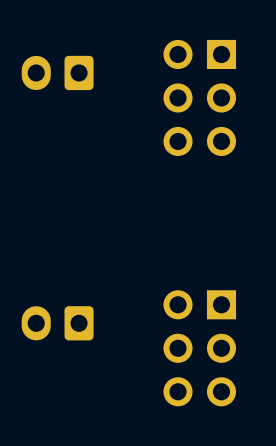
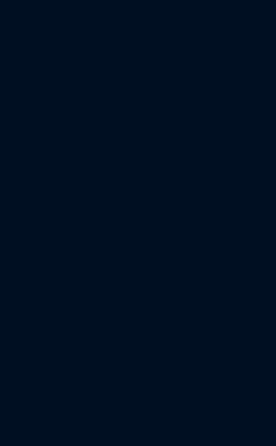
part: (57, 72) -> none
part: (199, 97) -> none
part: (57, 323) -> none
part: (199, 348) -> none

